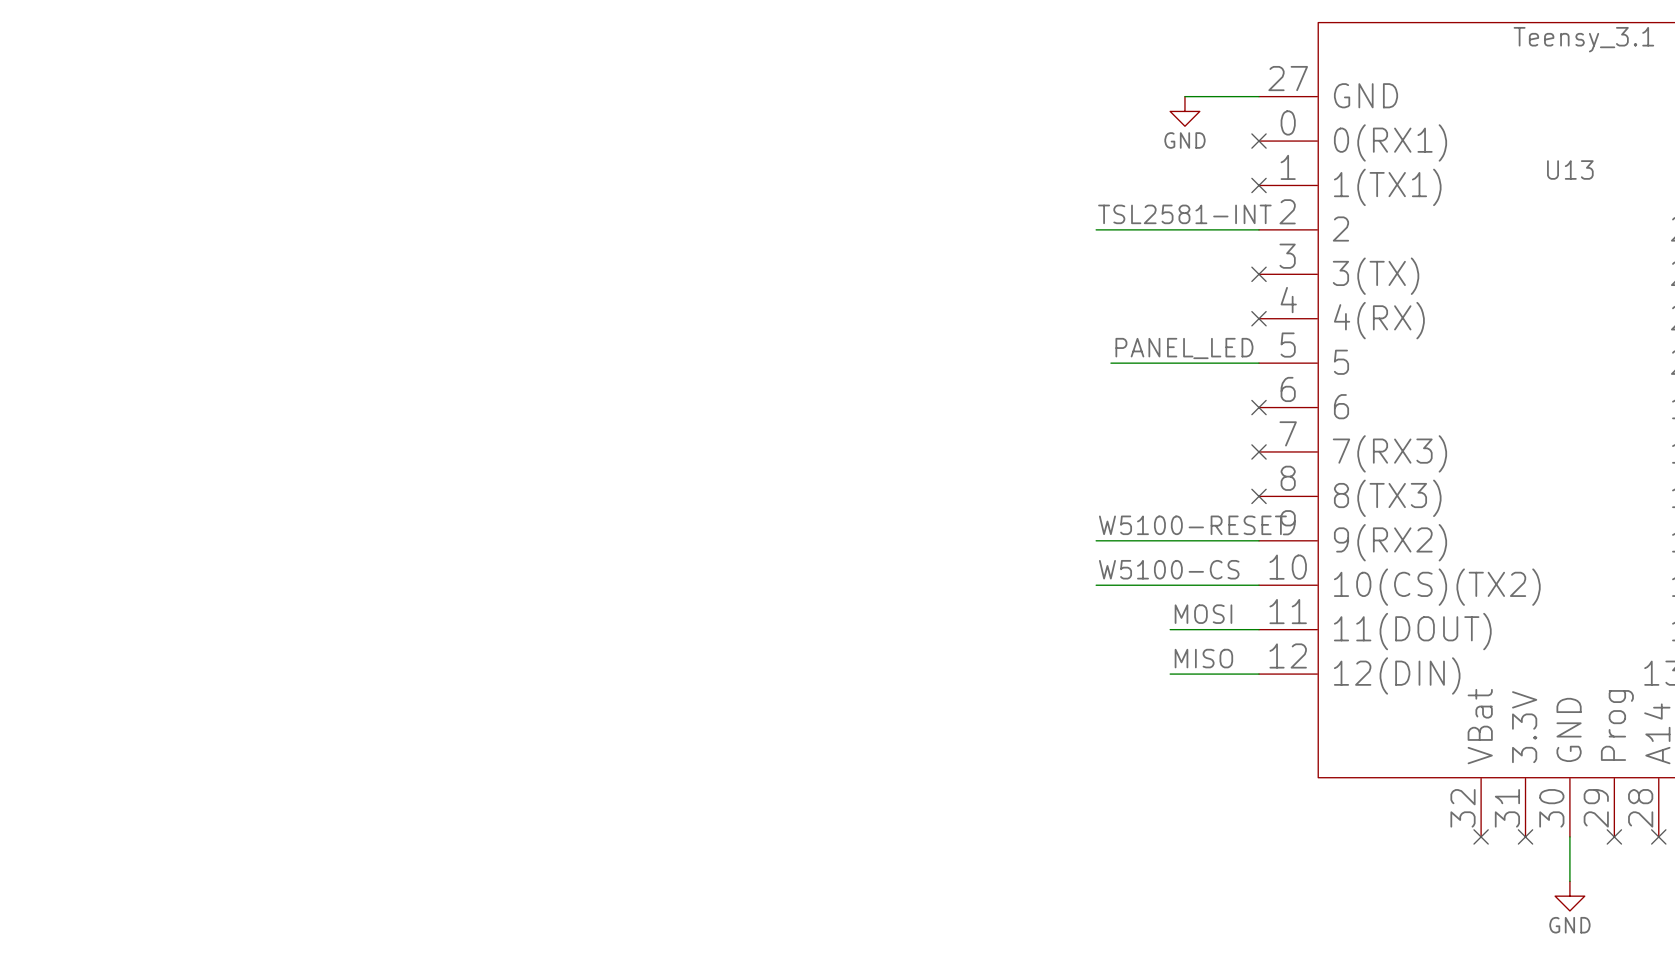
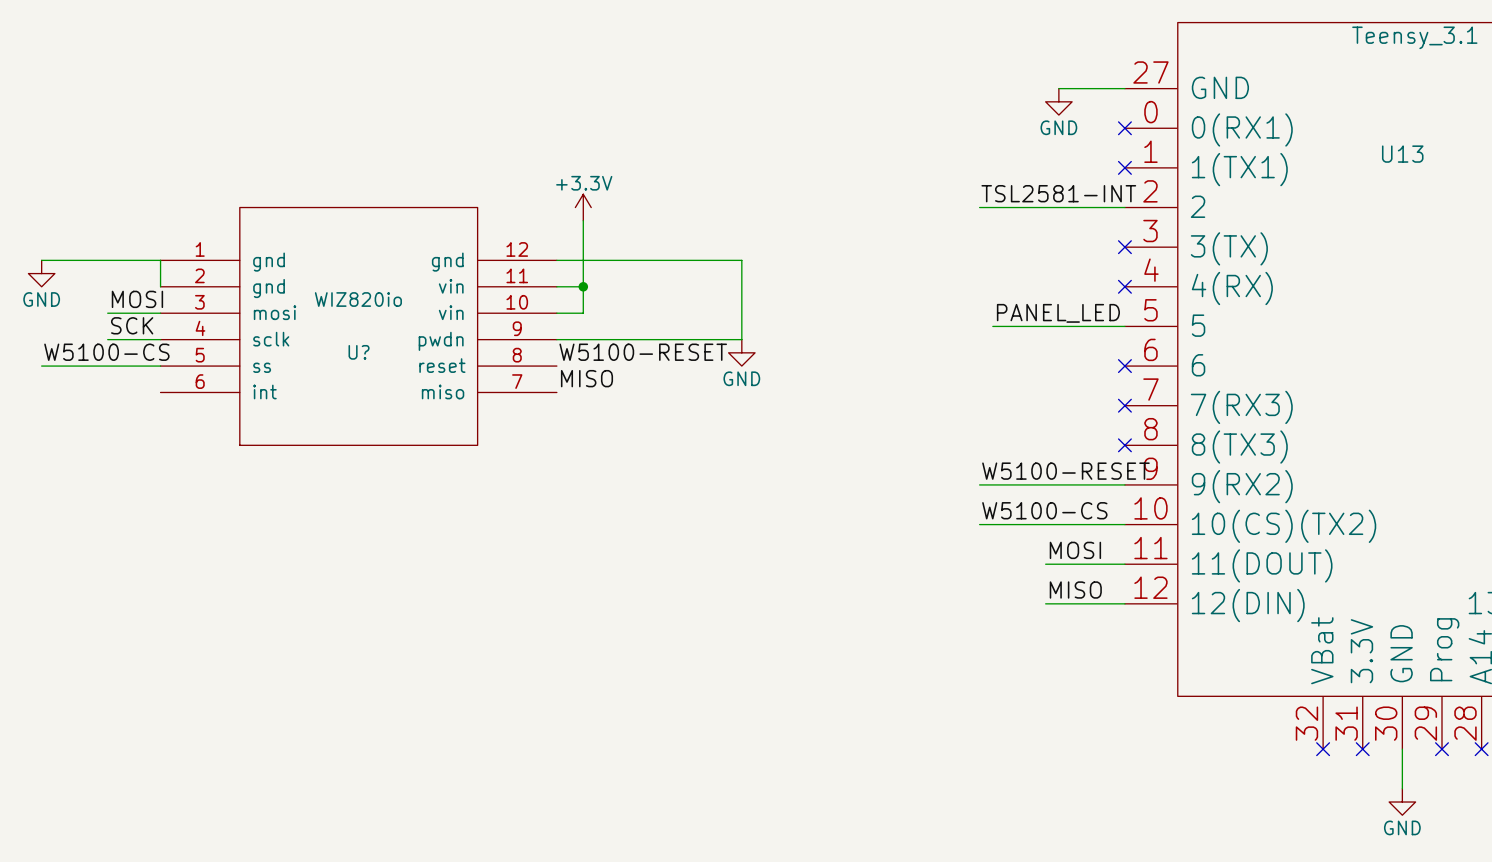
power symbol: none -> +3.3V (583, 207)
wire: none -> (583, 220) (583, 313) (556, 313)
wire: none -> (41, 260) (160, 260) (160, 286)
wire: none -> (556, 260) (741, 260) (741, 339) (556, 339)
power symbol: none -> GND (41, 273)
wire: none -> (556, 286) (583, 286)
junction: none -> (583, 286)
label: none -> MOSI (137, 299)
wire: none -> (107, 313) (160, 313)
label: none -> SCK (132, 325)
U?: none -> WIZ820io (358, 326)
wire: none -> (107, 339) (160, 339)
label: none -> W5100-CS (106, 352)
label: none -> W5100-RESET (643, 352)
power symbol: none -> GND (741, 352)
wire: none -> (41, 366) (160, 366)
label: none -> MISO (586, 378)

